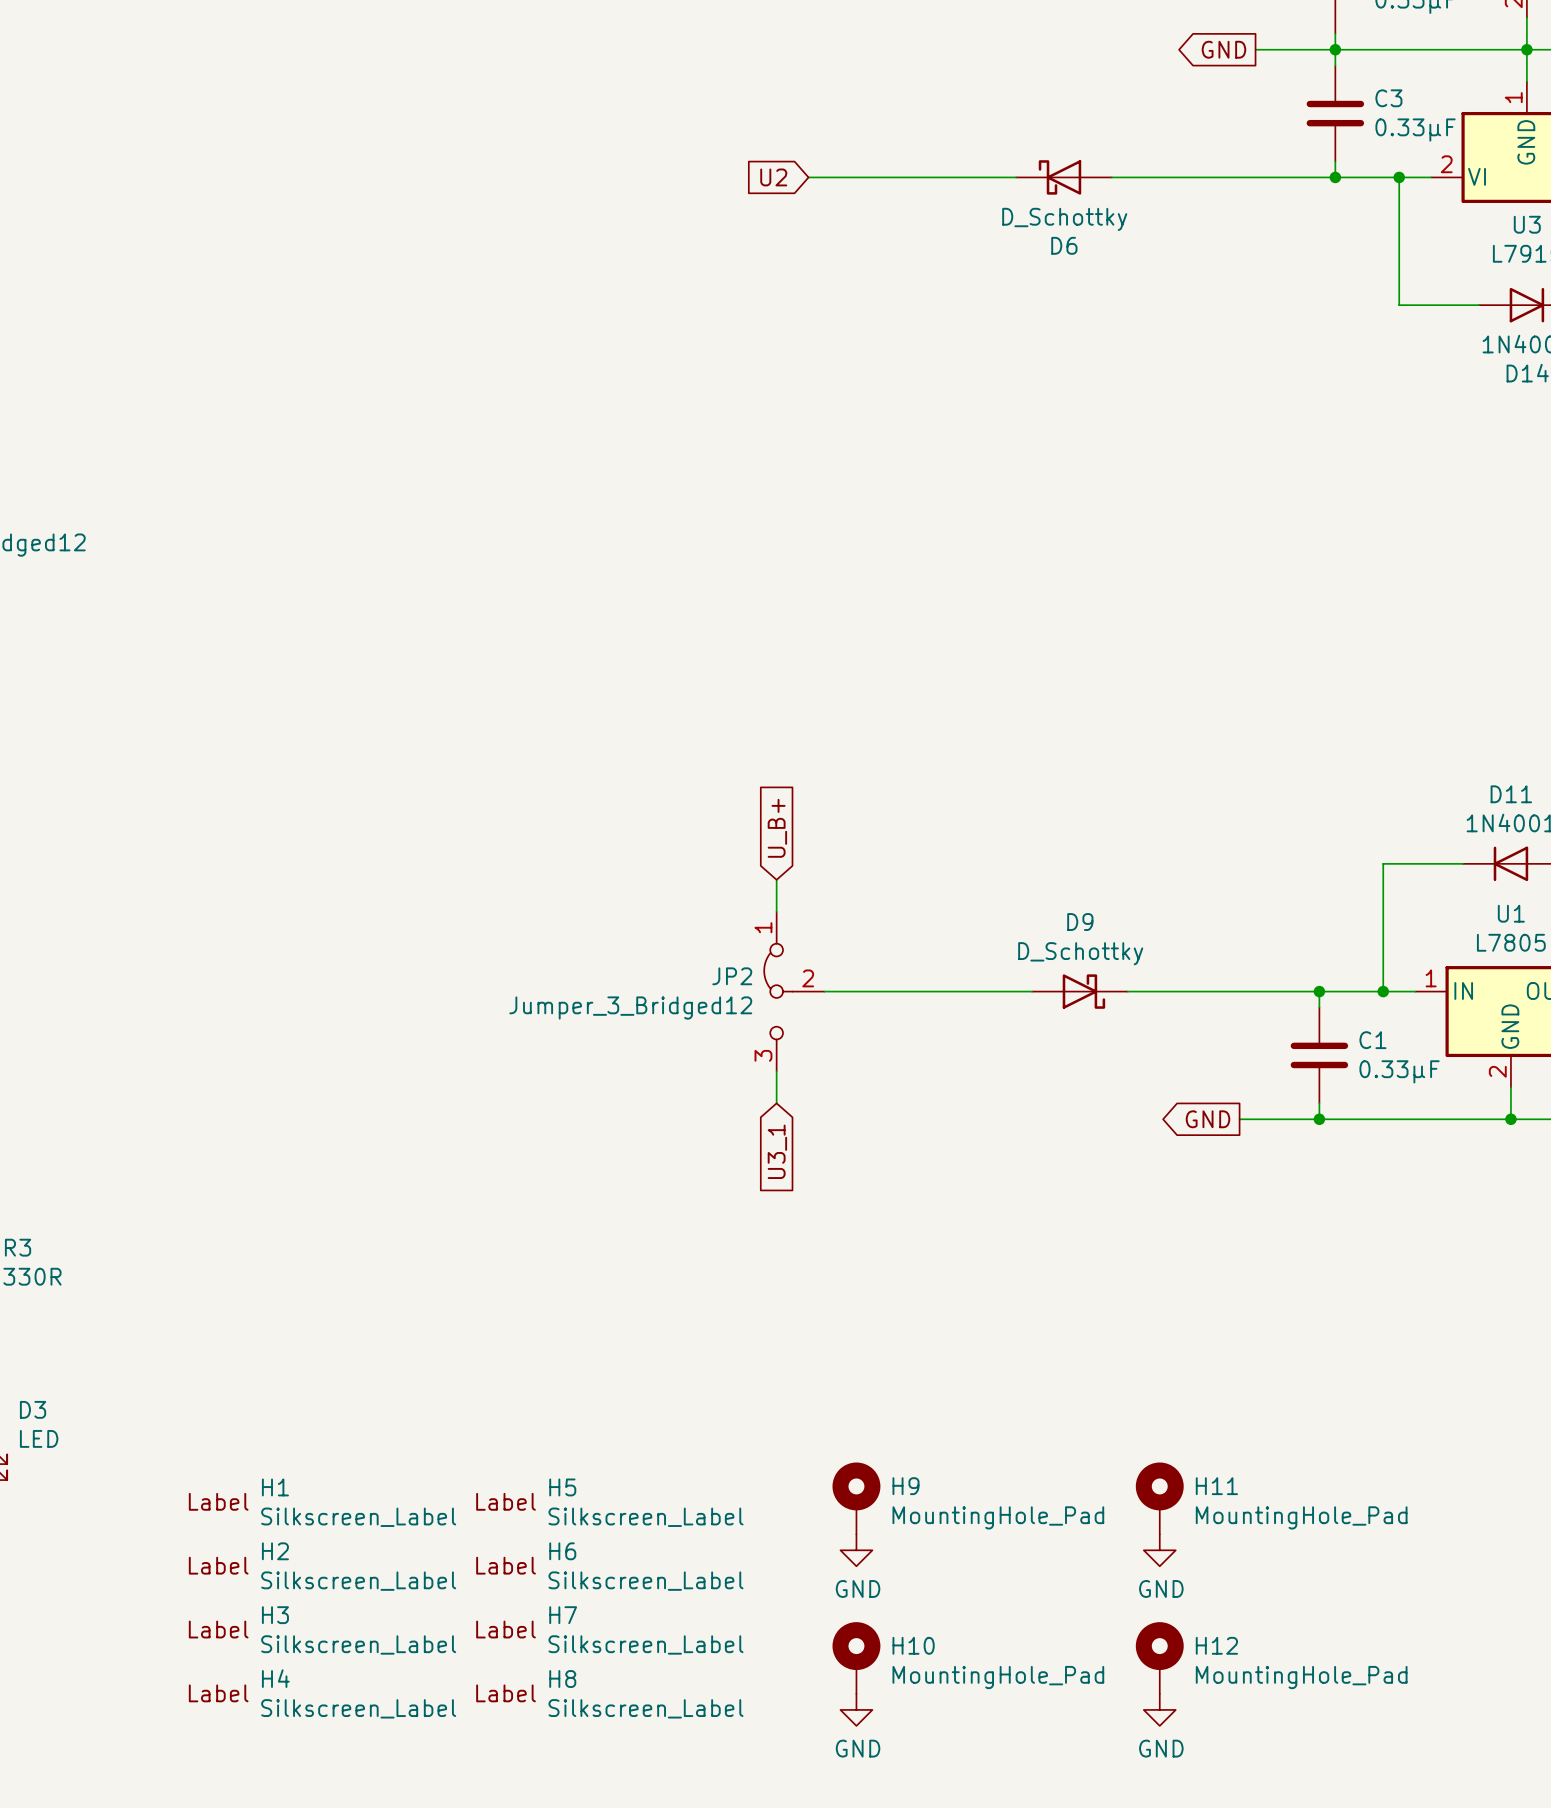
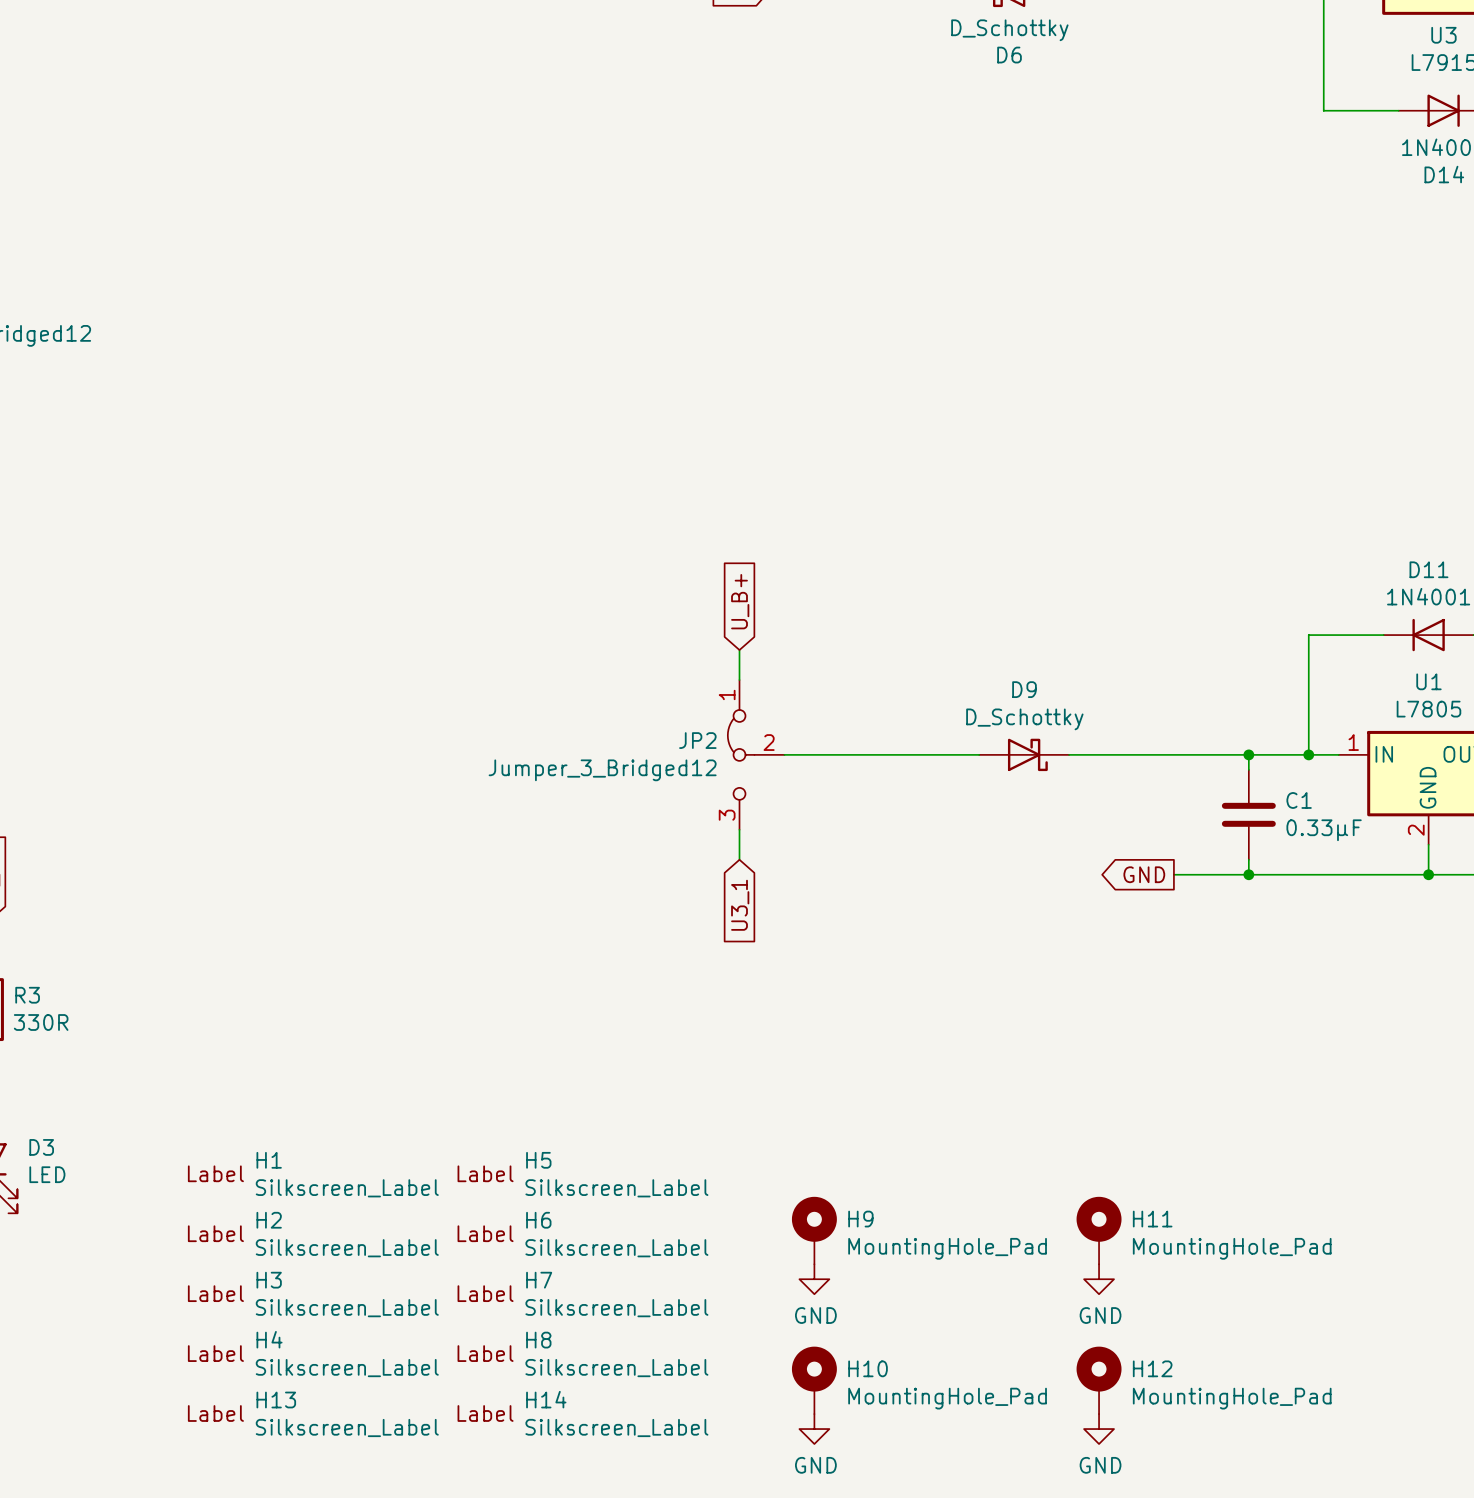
H1: none -> Silkscreen_Label (313, 1174)
H5: none -> Silkscreen_Label (582, 1174)
H1 name: H1 (275, 1487) -> H2 (269, 1220)
H5 name: H5 (562, 1487) -> H6 (538, 1220)
H2 name: H2 (275, 1551) -> H3 (269, 1280)
H6 name: H6 (562, 1551) -> H7 (539, 1280)
H3 name: H3 (275, 1615) -> H4 (269, 1339)
H7 name: H7 (563, 1615) -> H8 (538, 1340)
H4 name: H4 (275, 1678) -> H13 (276, 1400)
H8 name: H8 (562, 1679) -> H14 (546, 1399)

